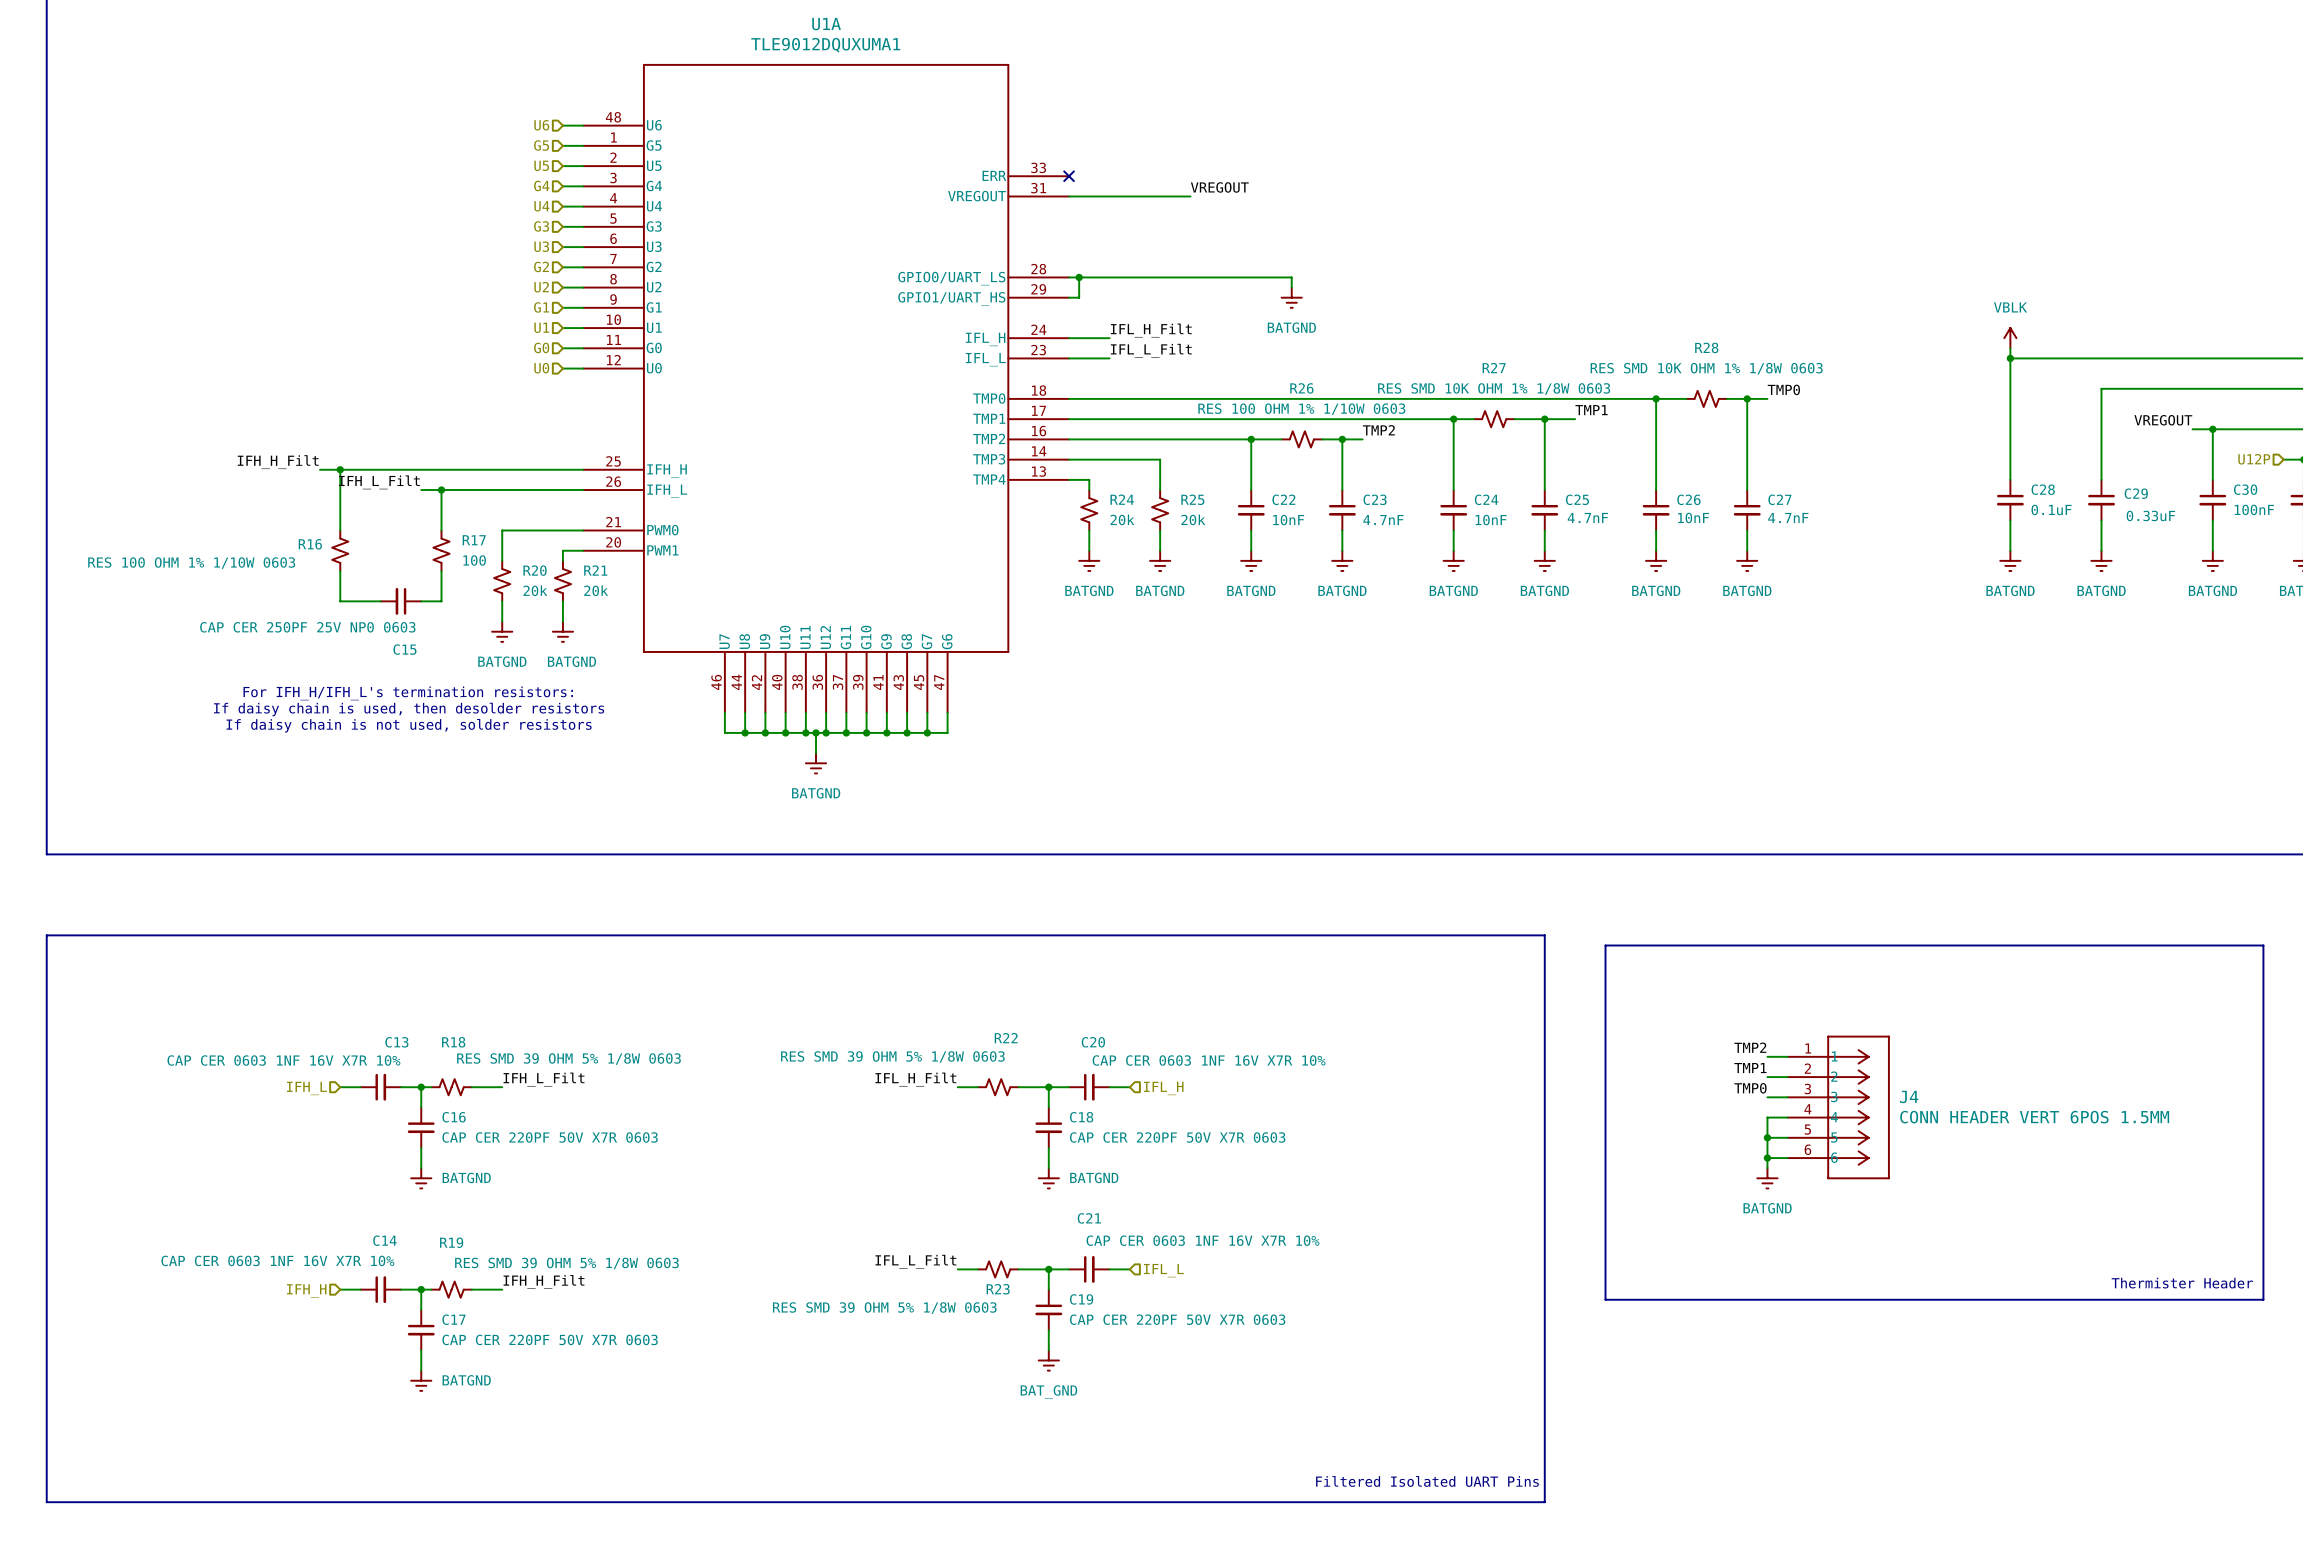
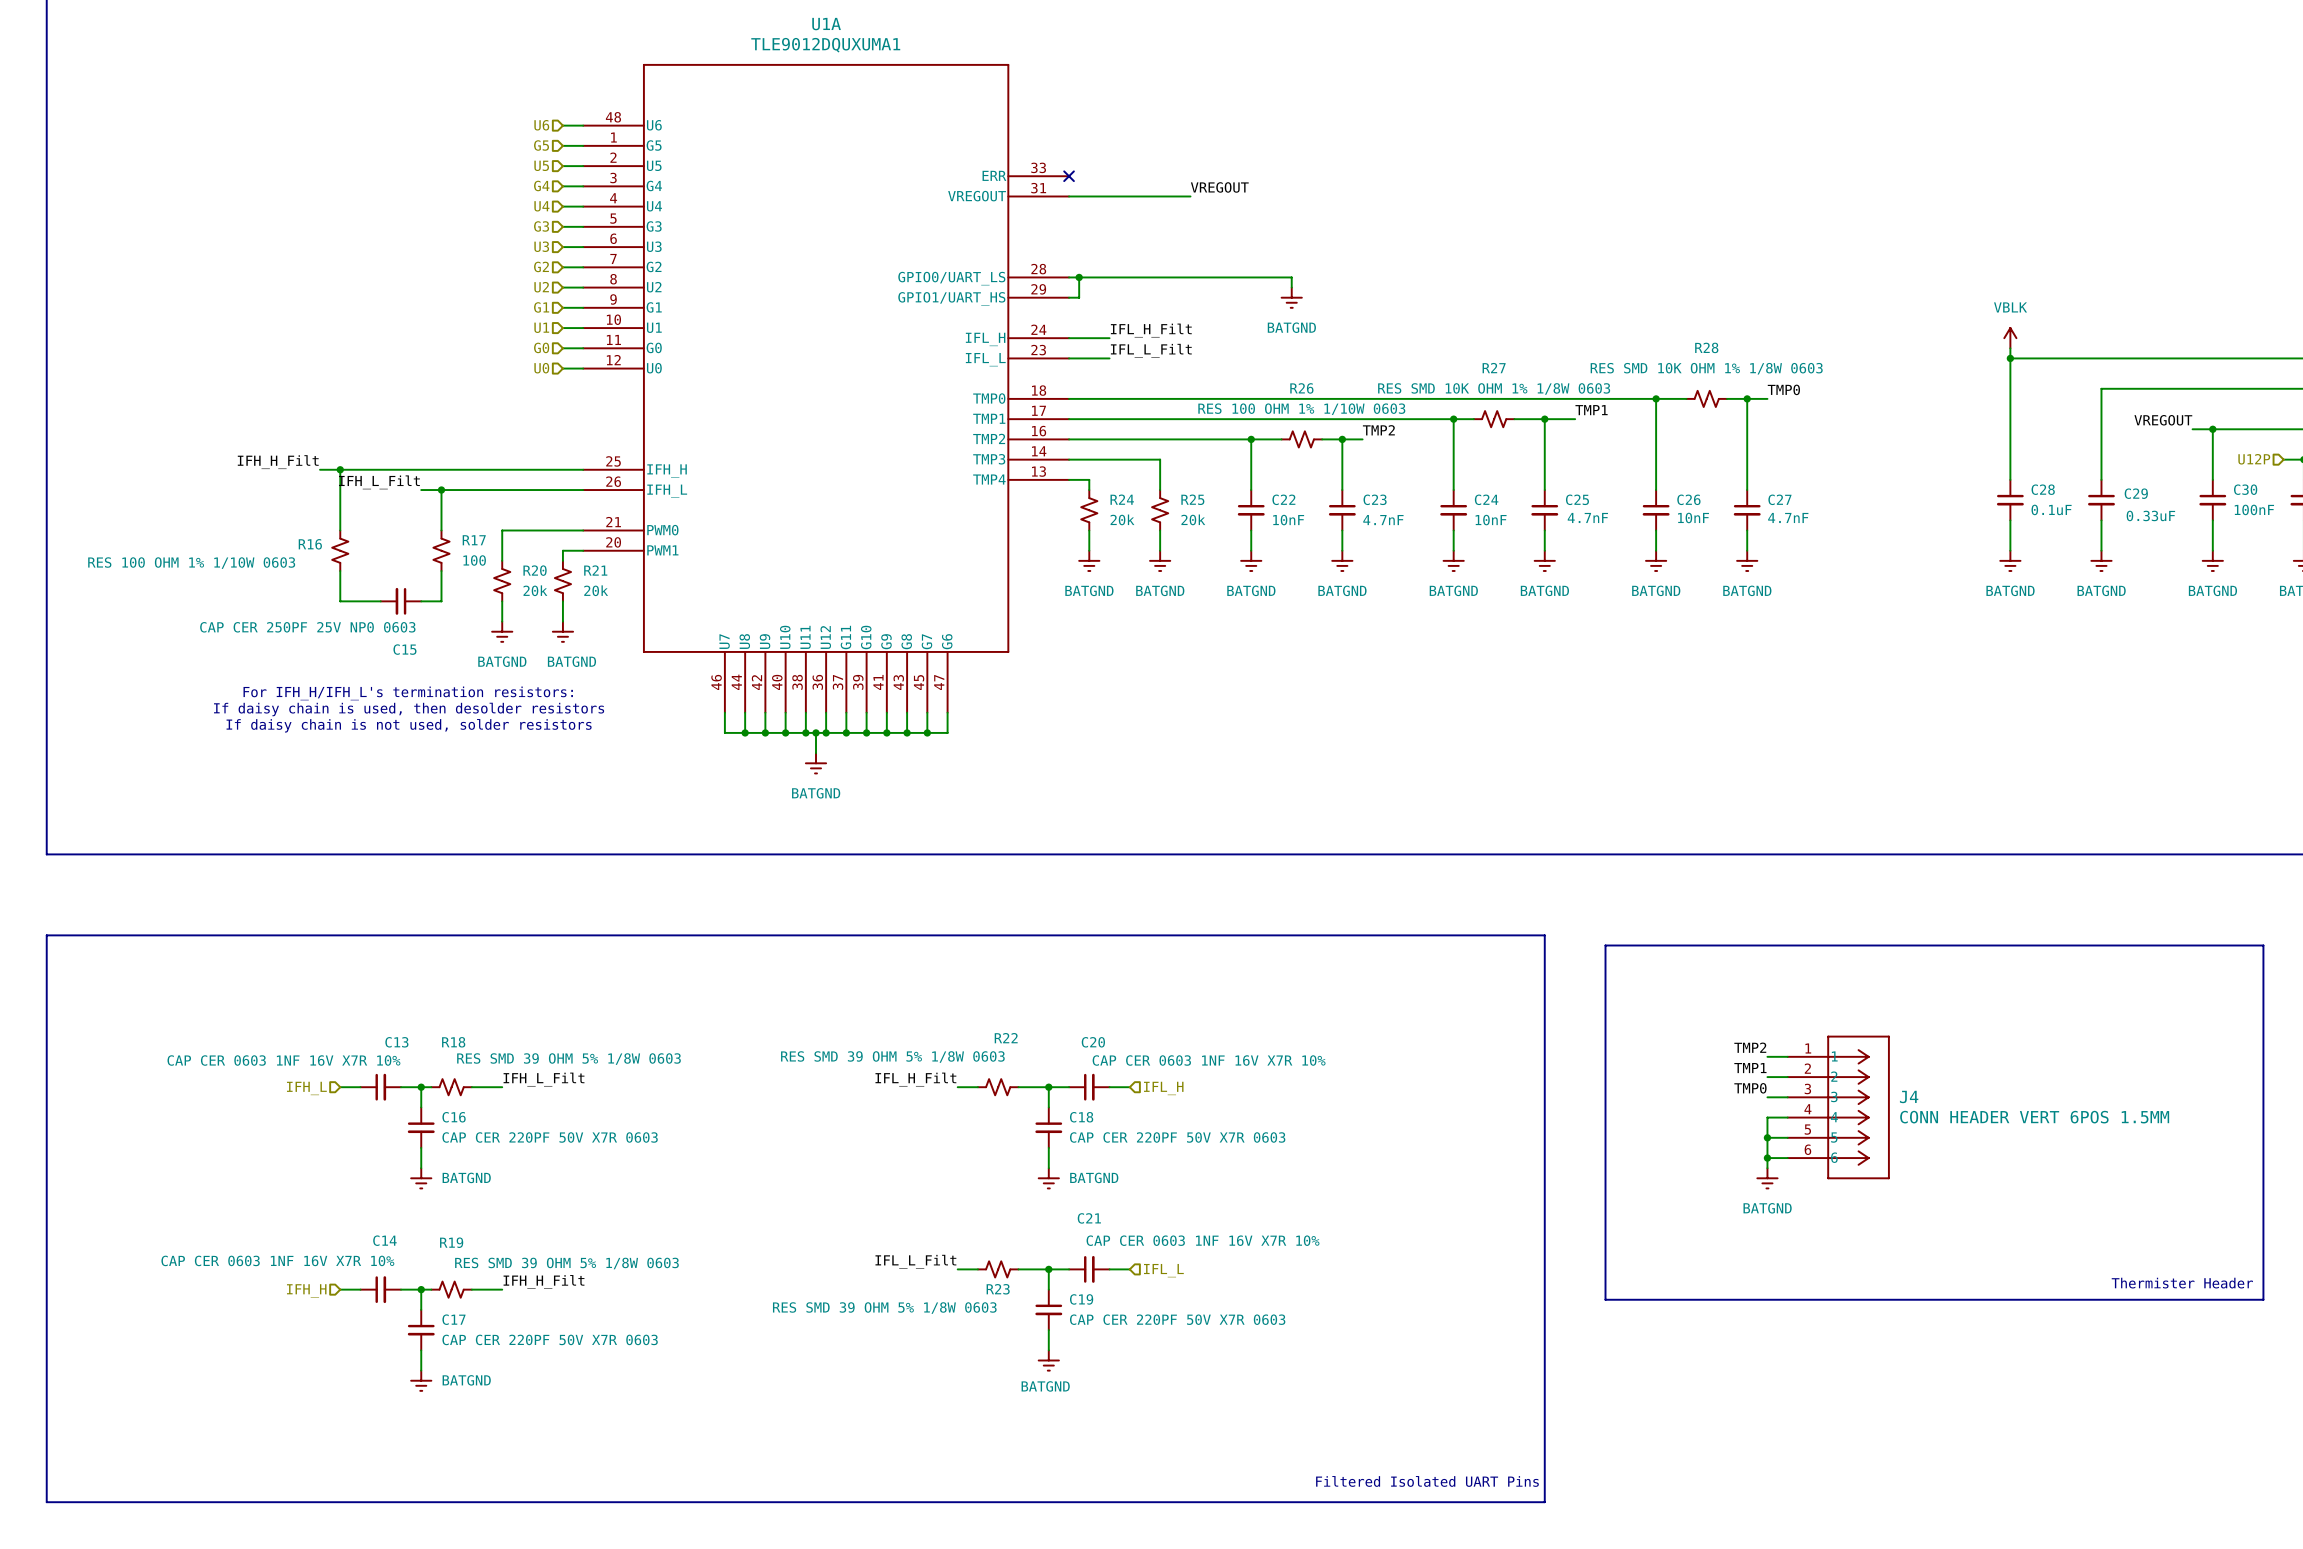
power symbol: BAT_GND (1048, 1360) -> BATGND (1048, 1360)

